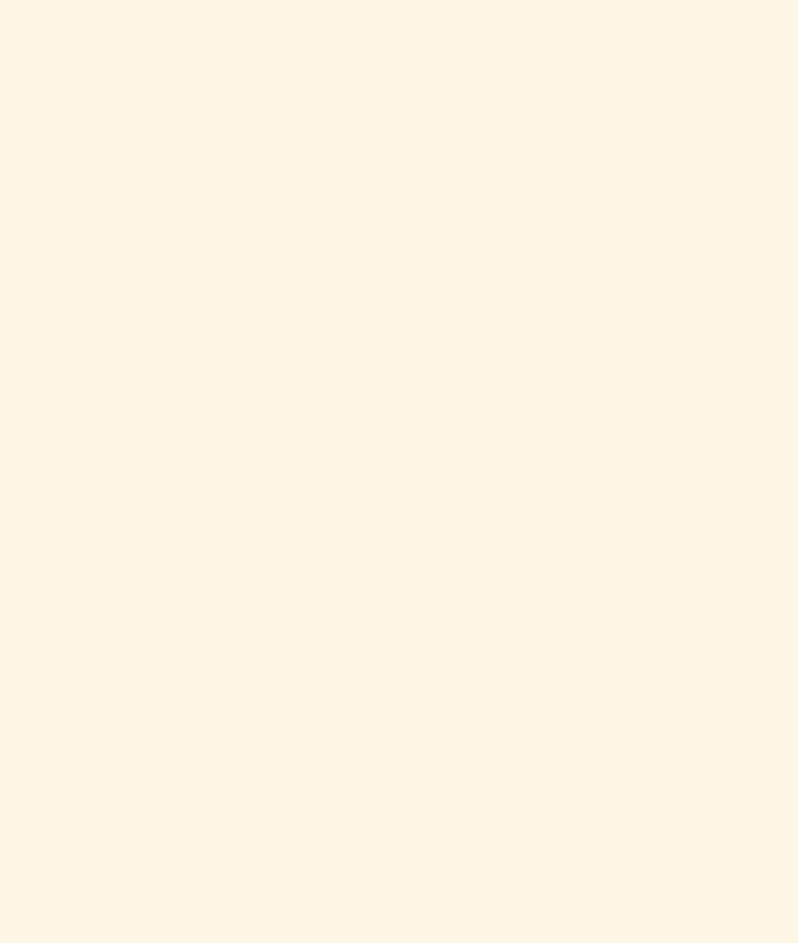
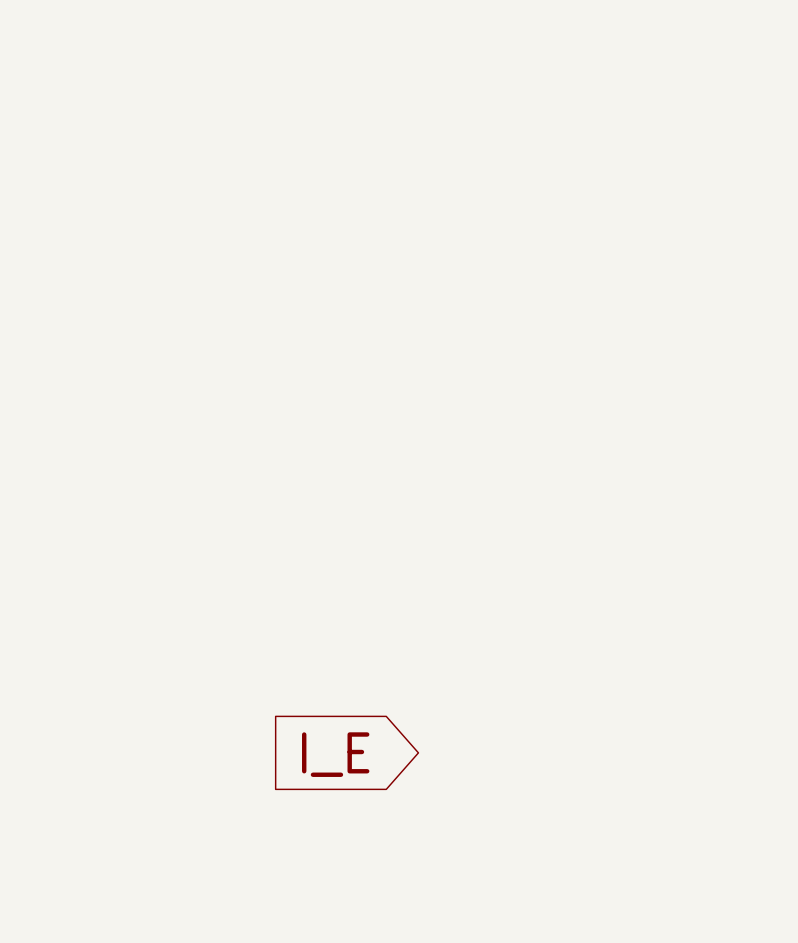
global label: none -> I_E (335, 754)

